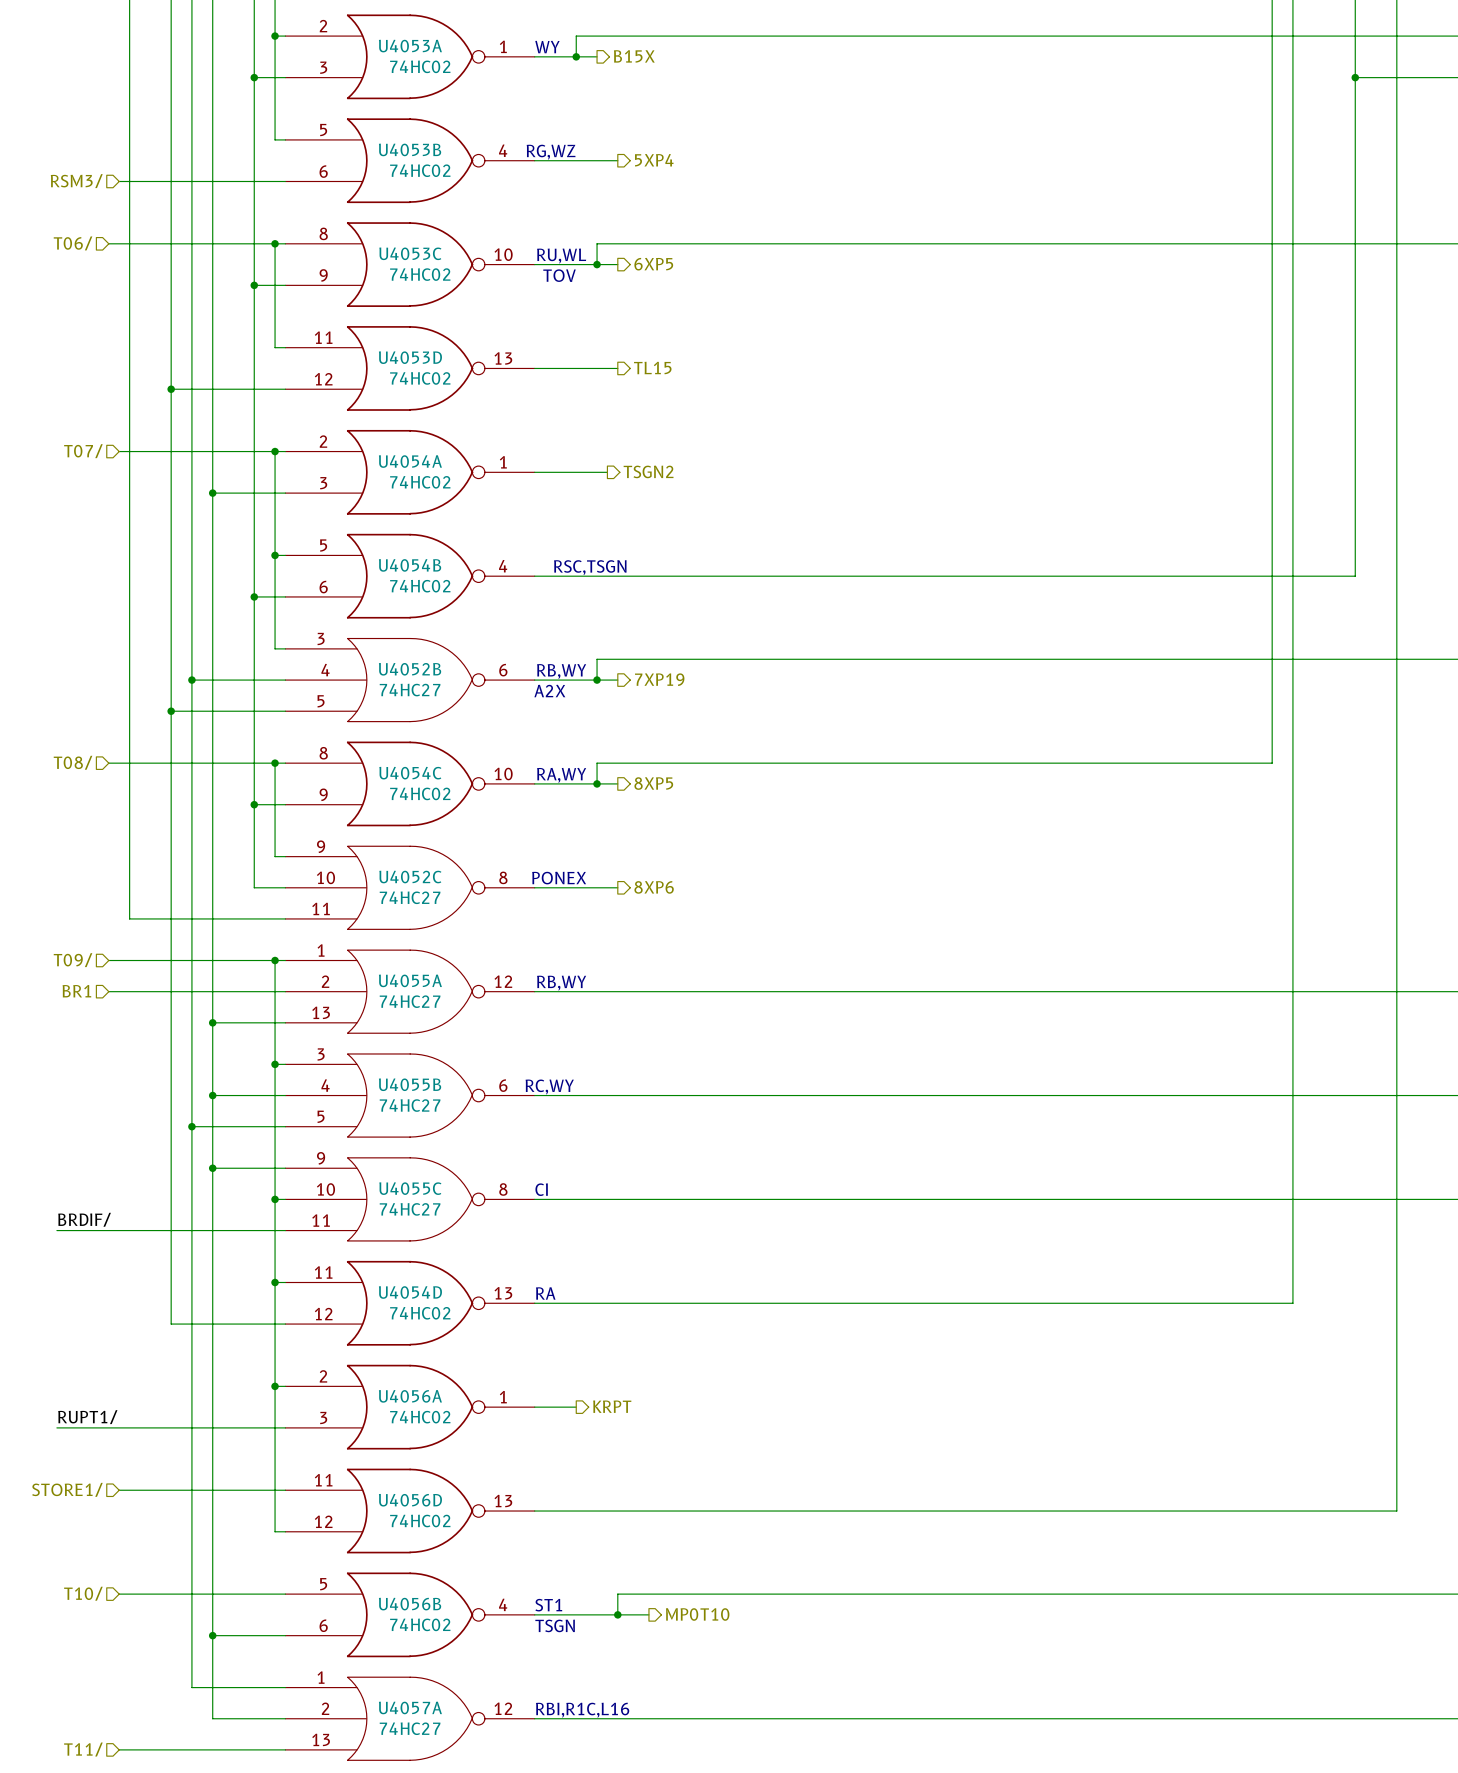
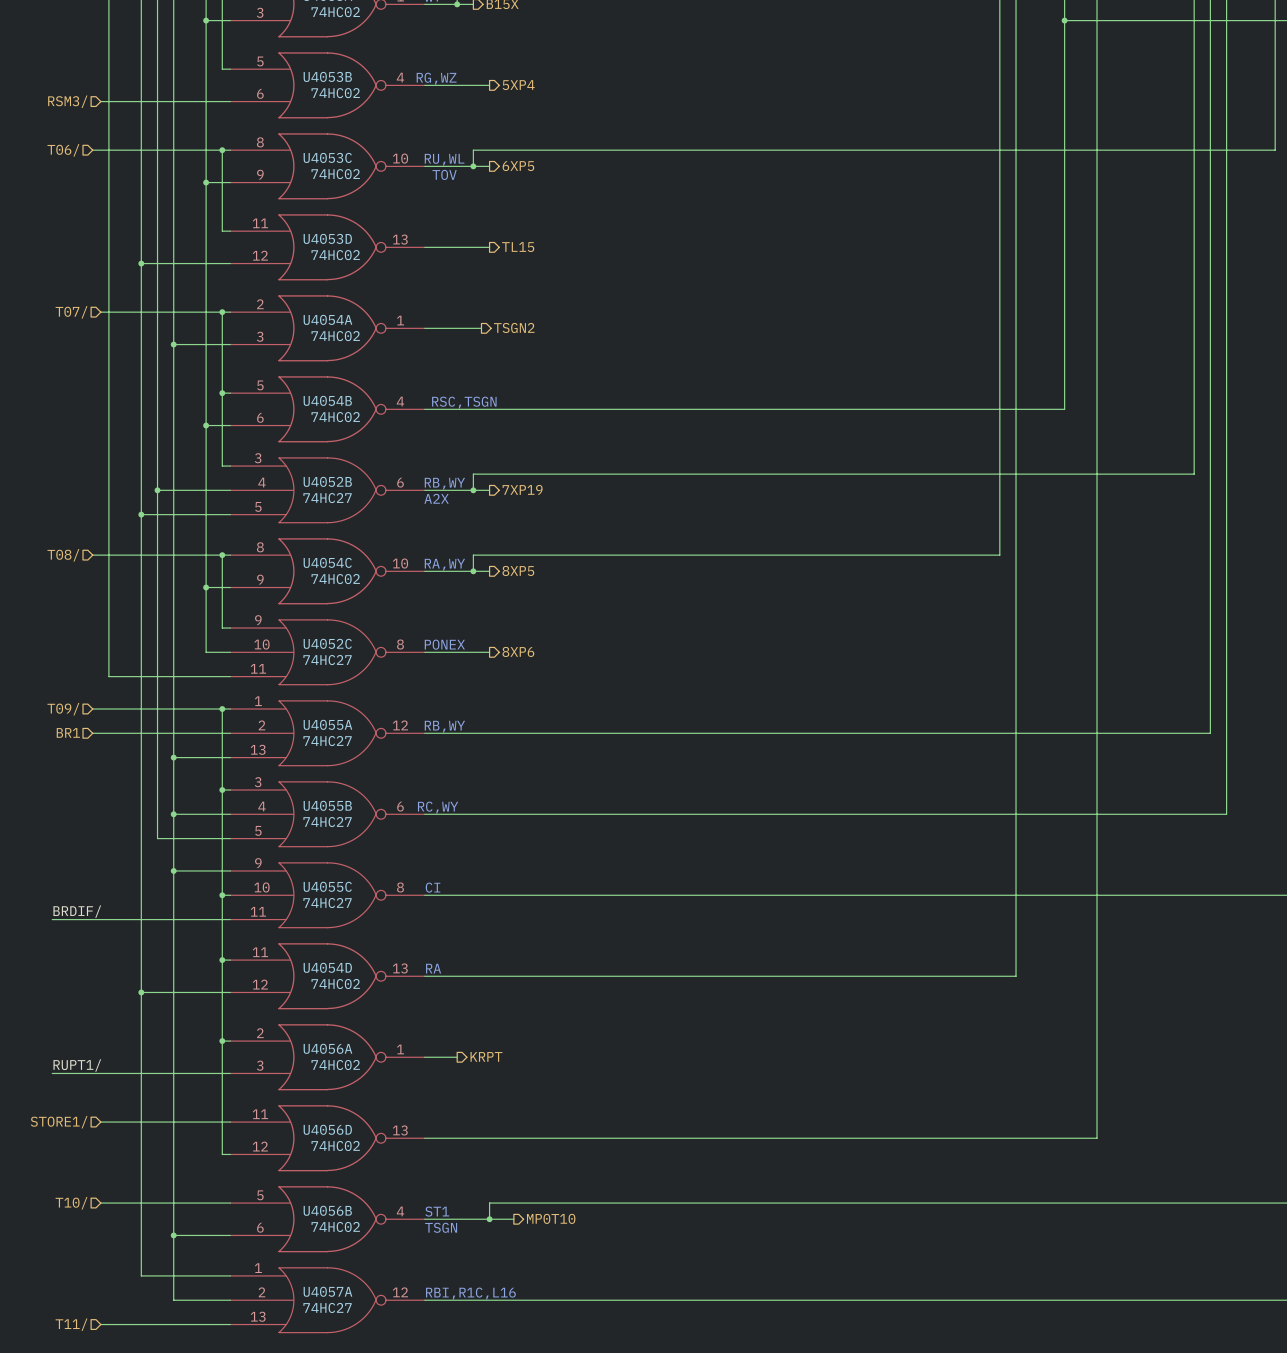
wire: (191, 1126) (191, 1687) -> (141, 992) (141, 1275) (157, 1275)
junction: (191, 1126) -> none
junction: none -> (141, 992)

